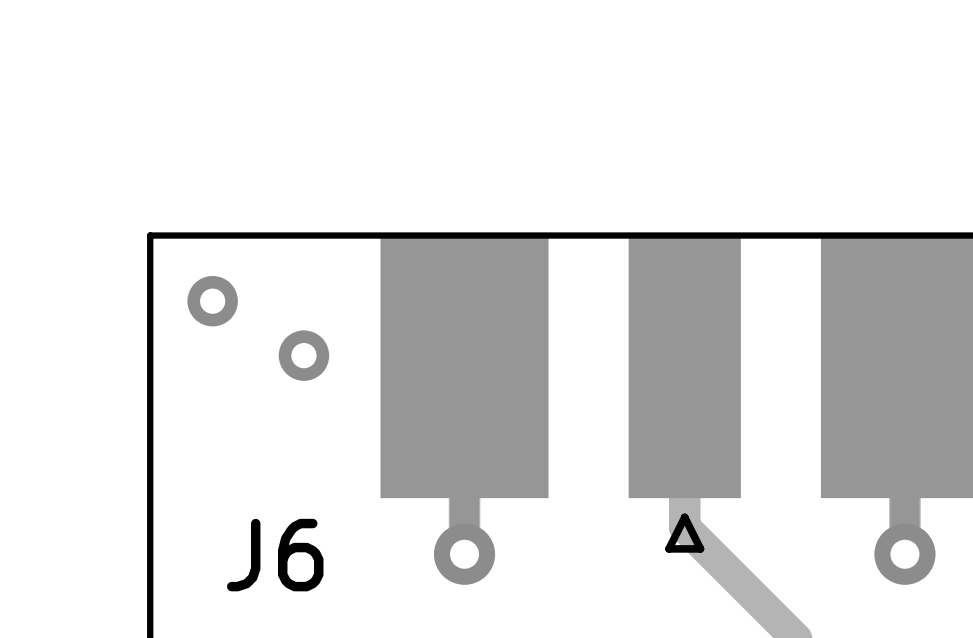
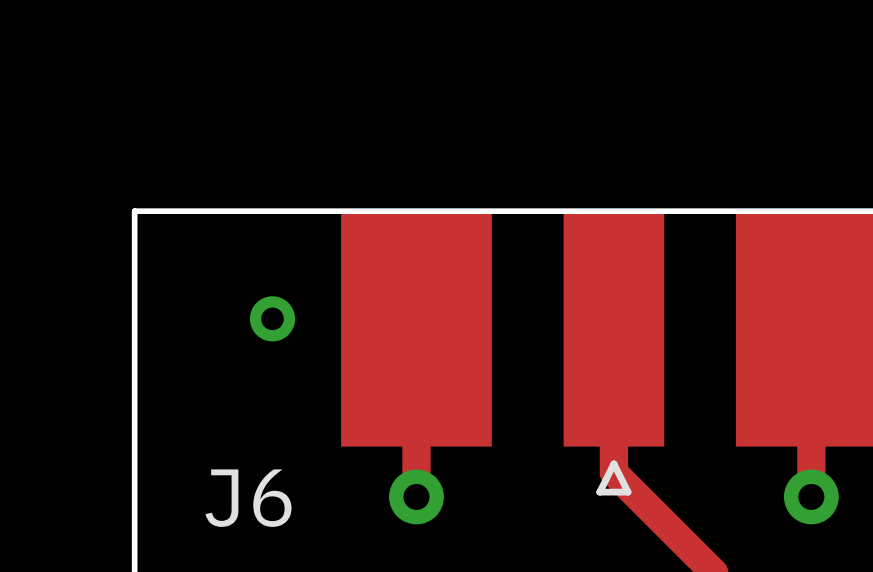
via: (212, 301) -> none

